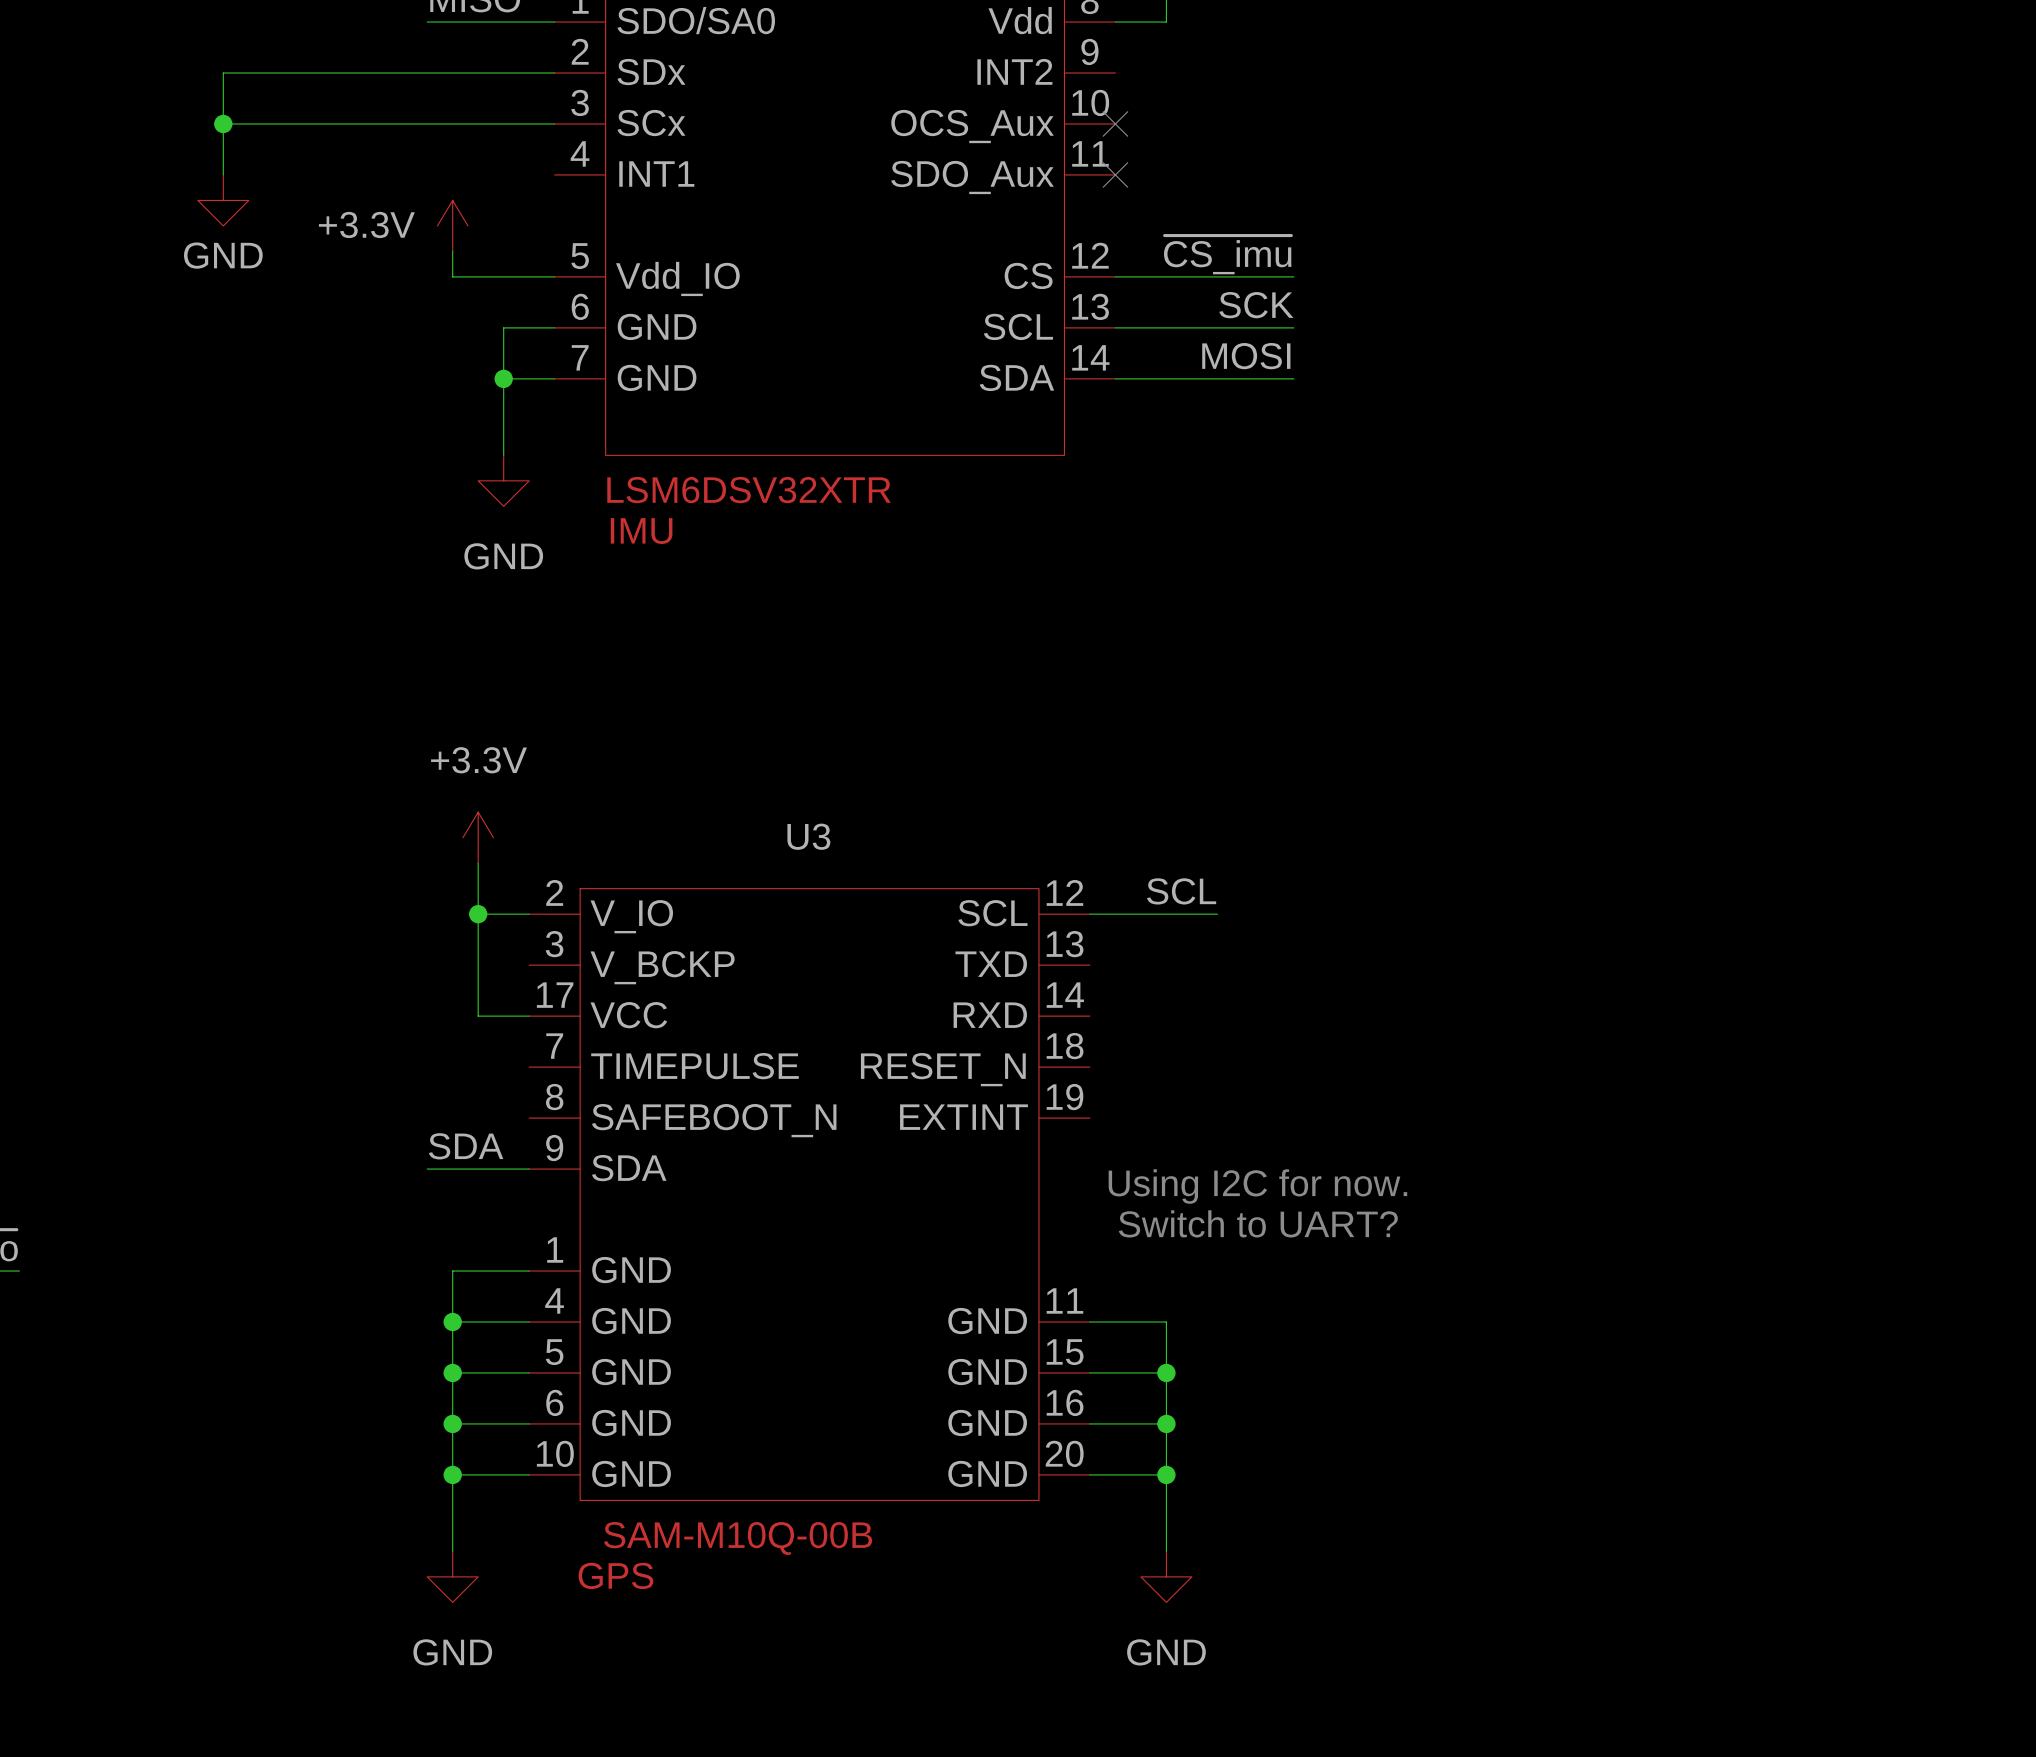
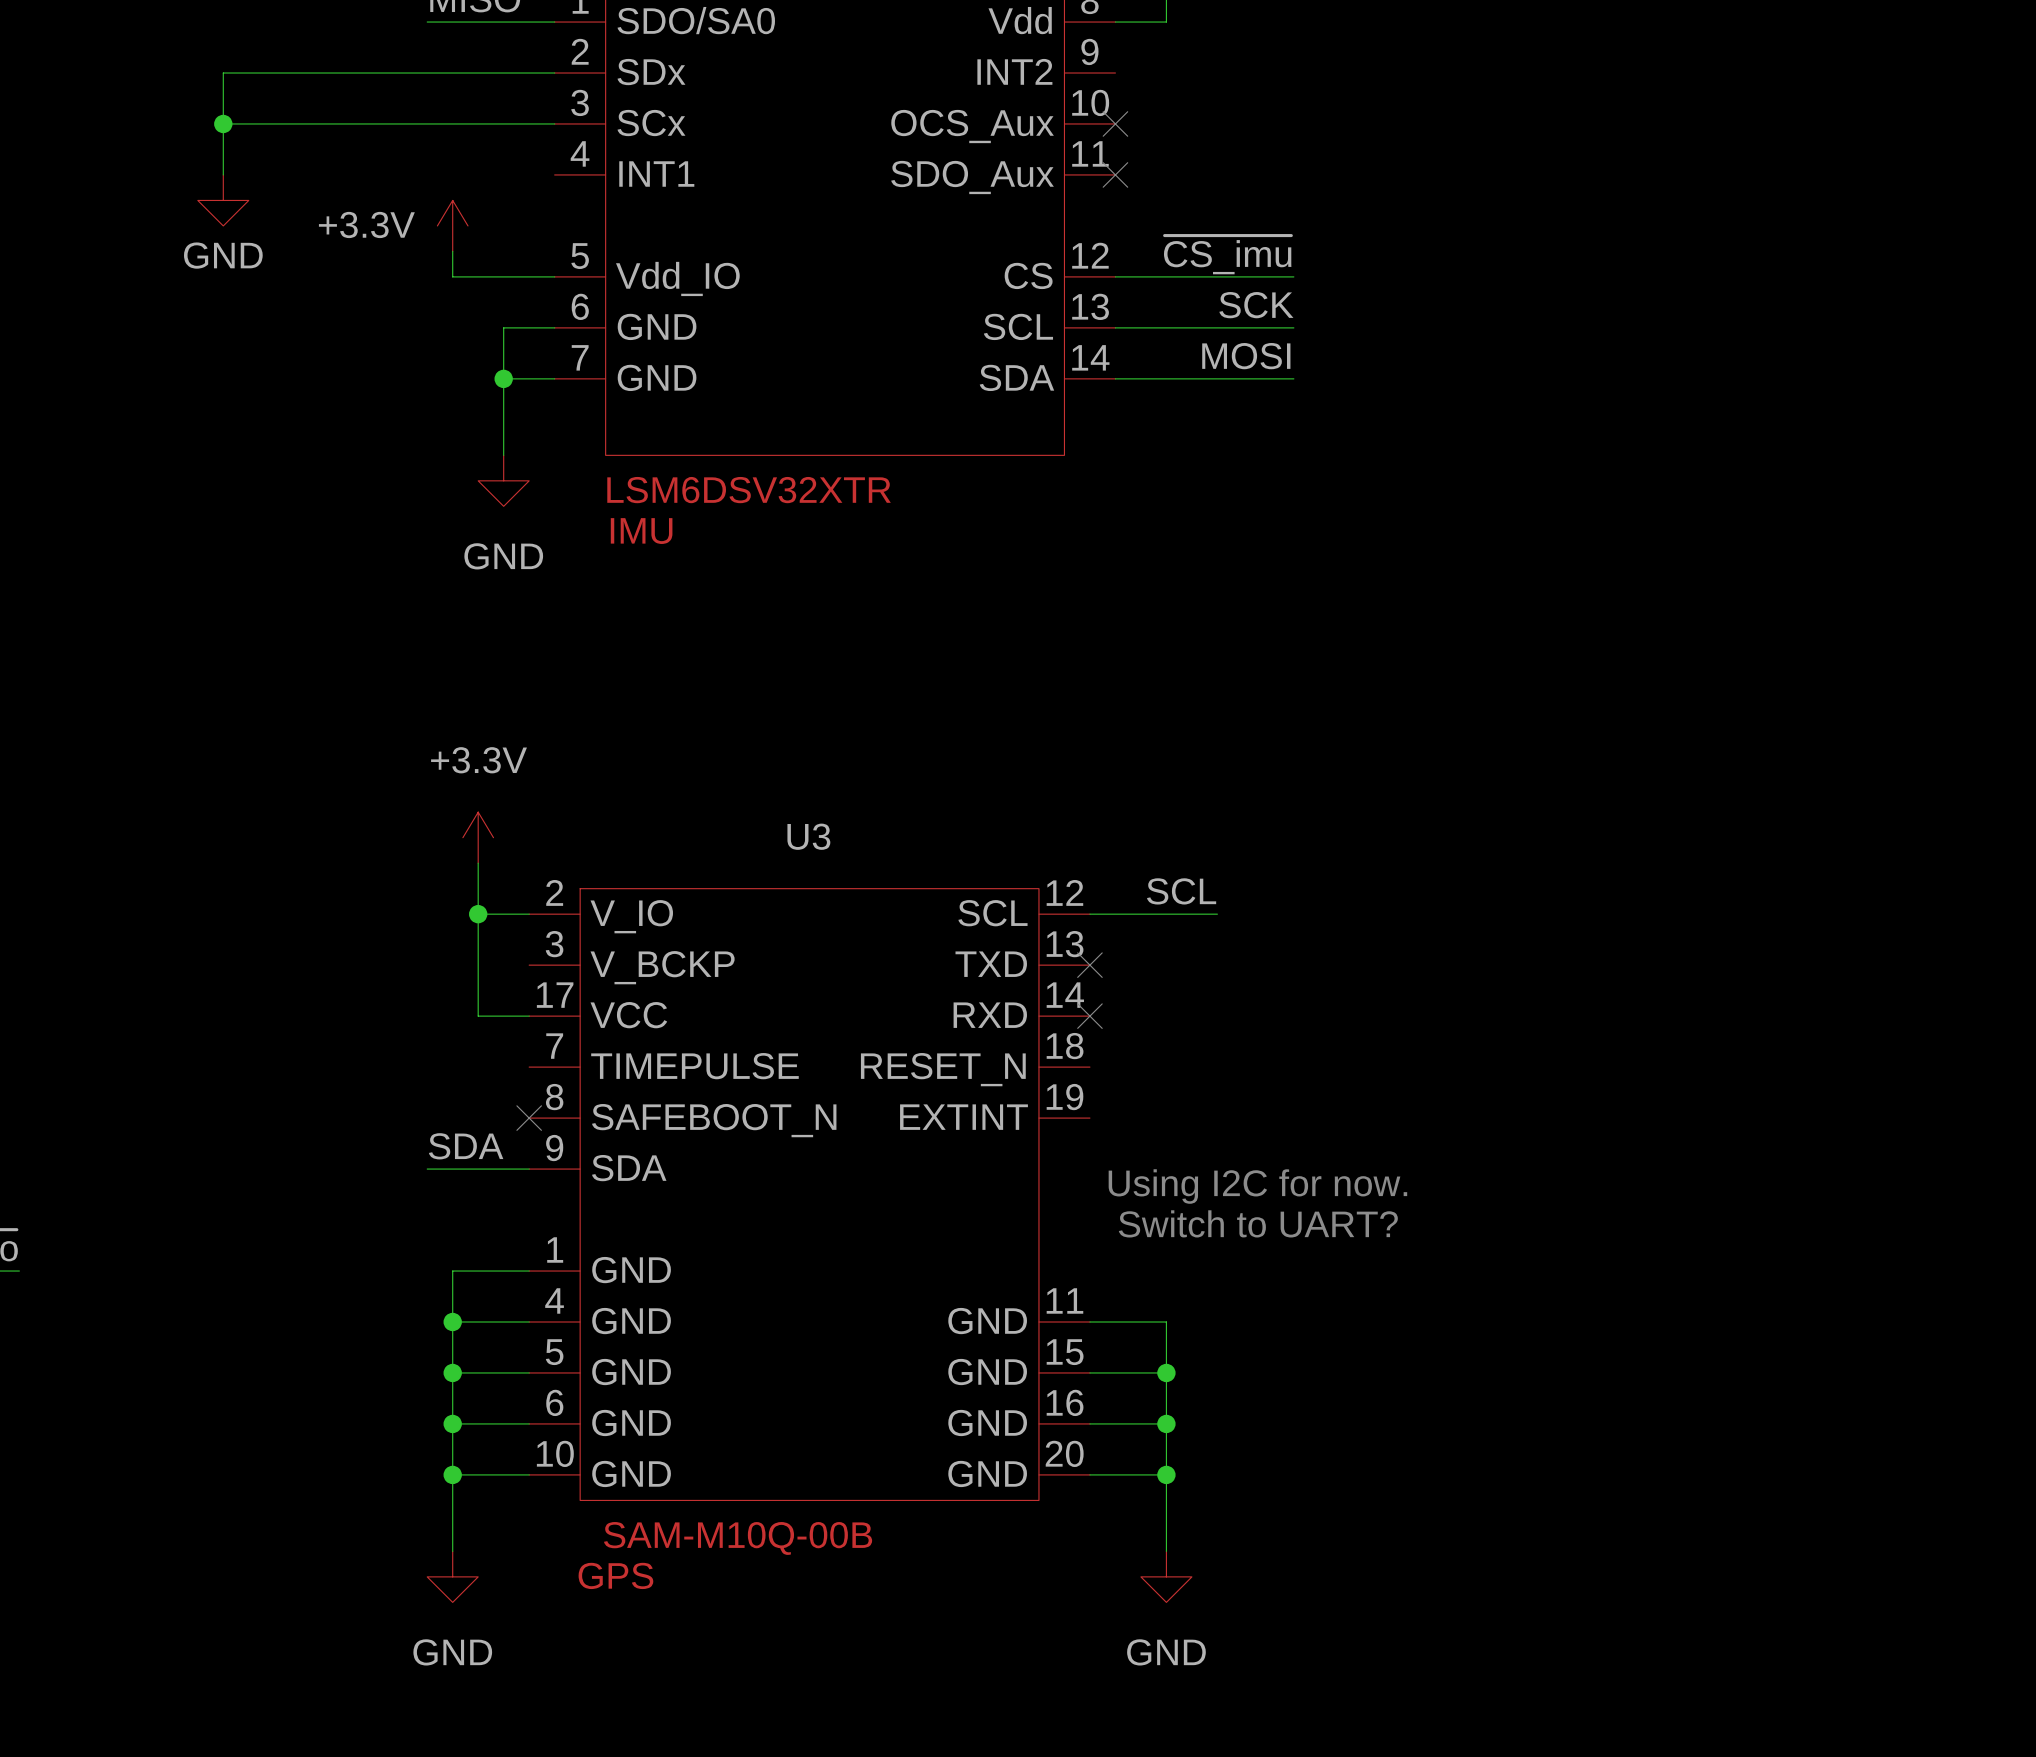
no-connect mark: none -> (1089, 965)
no-connect mark: none -> (1089, 1016)
no-connect mark: none -> (529, 1118)

